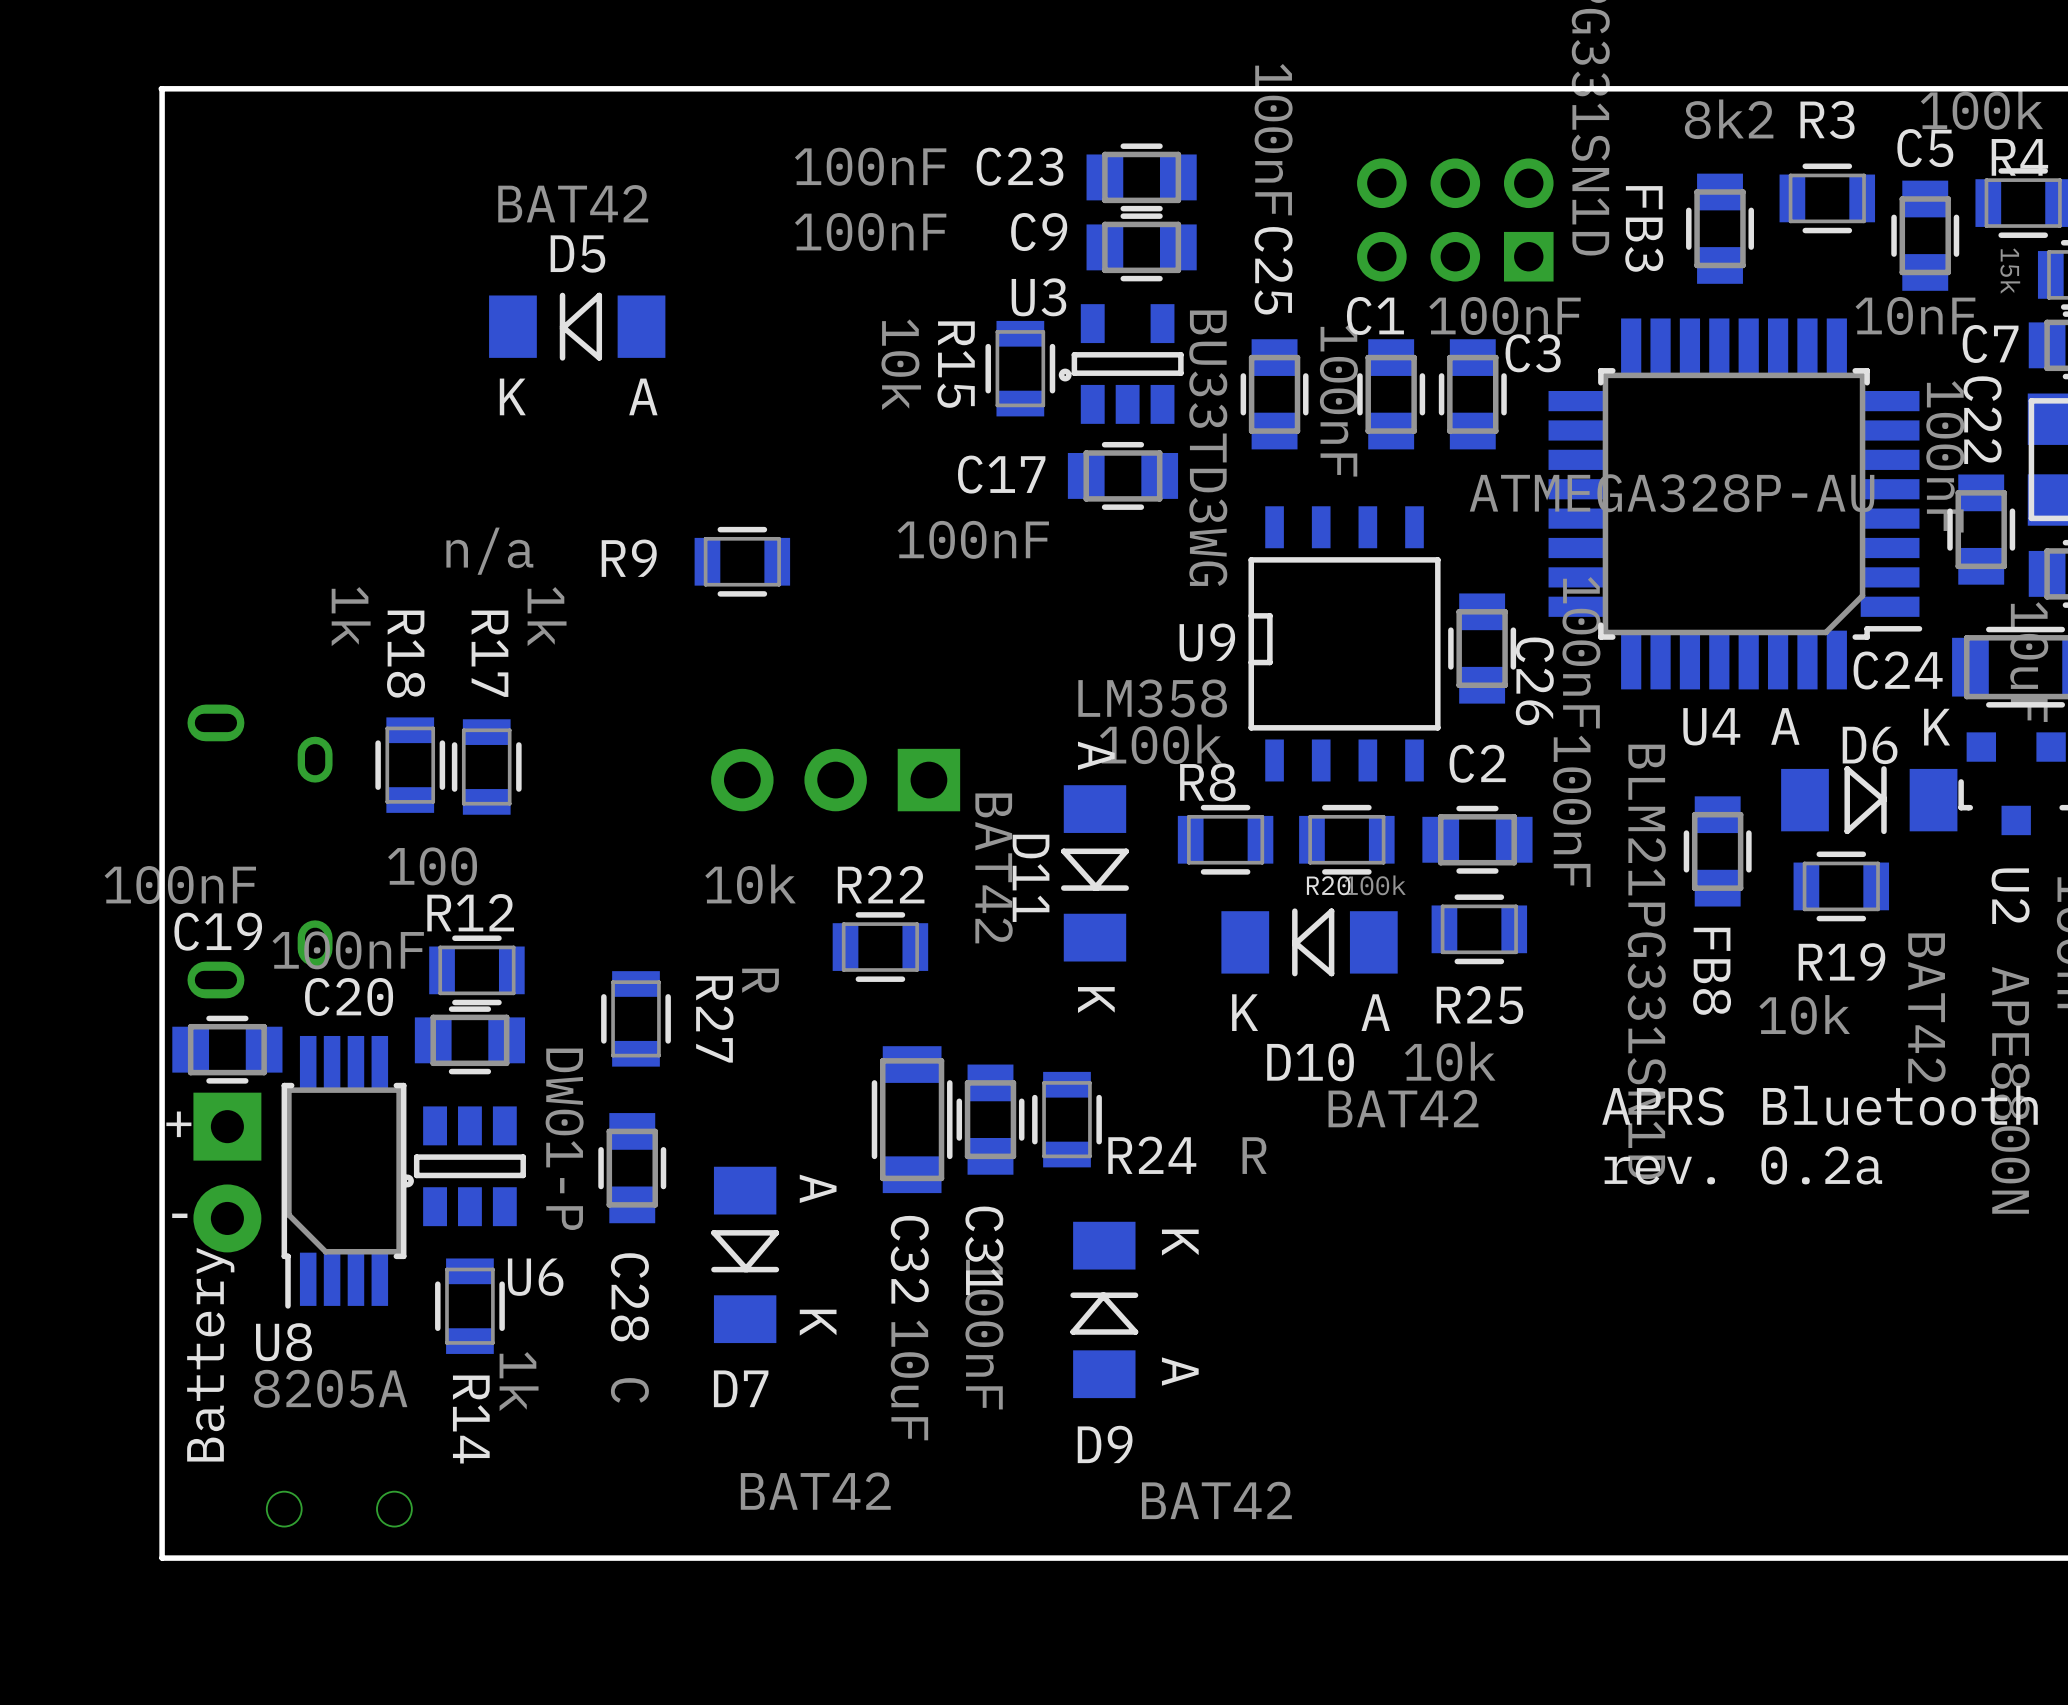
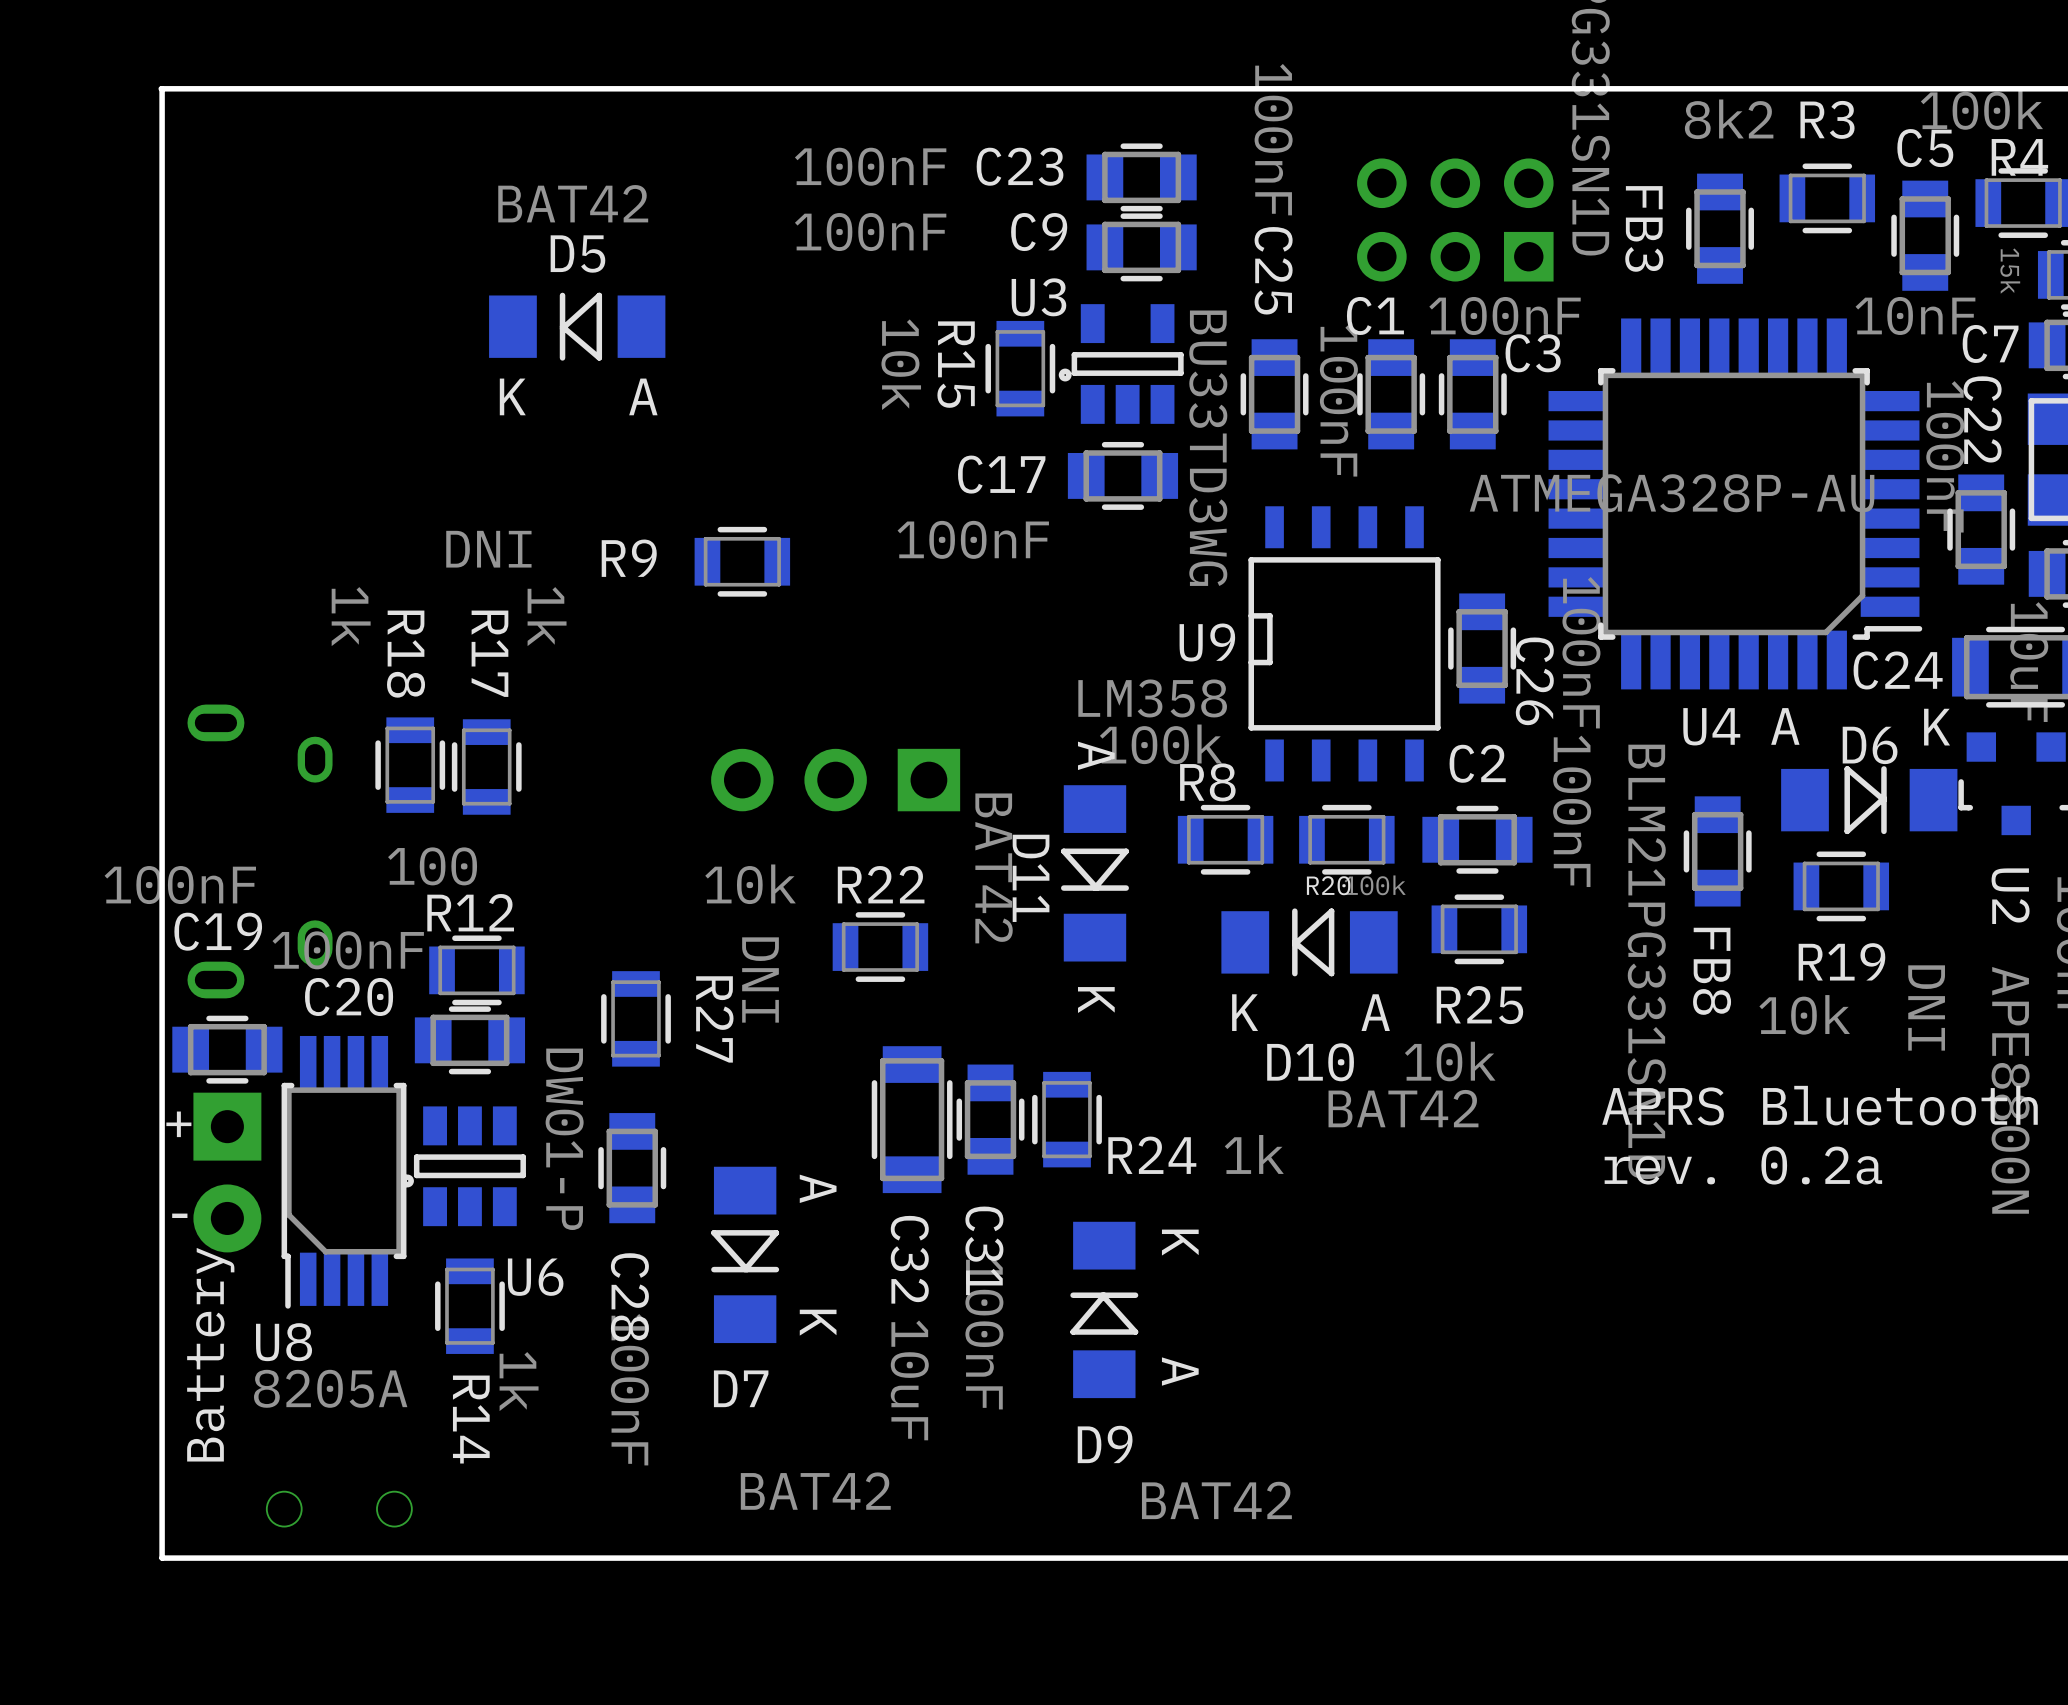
R9 value: n/a (489, 551) -> DNI (488, 549)
R27 value: R (760, 980) -> DNI (760, 979)
D6 value: BAT42 (1926, 1008) -> DNI (1926, 1007)
R24 value: R (1254, 1155) -> 1k (1254, 1154)
C28 value: C (629, 1390) -> 100nF (629, 1389)

